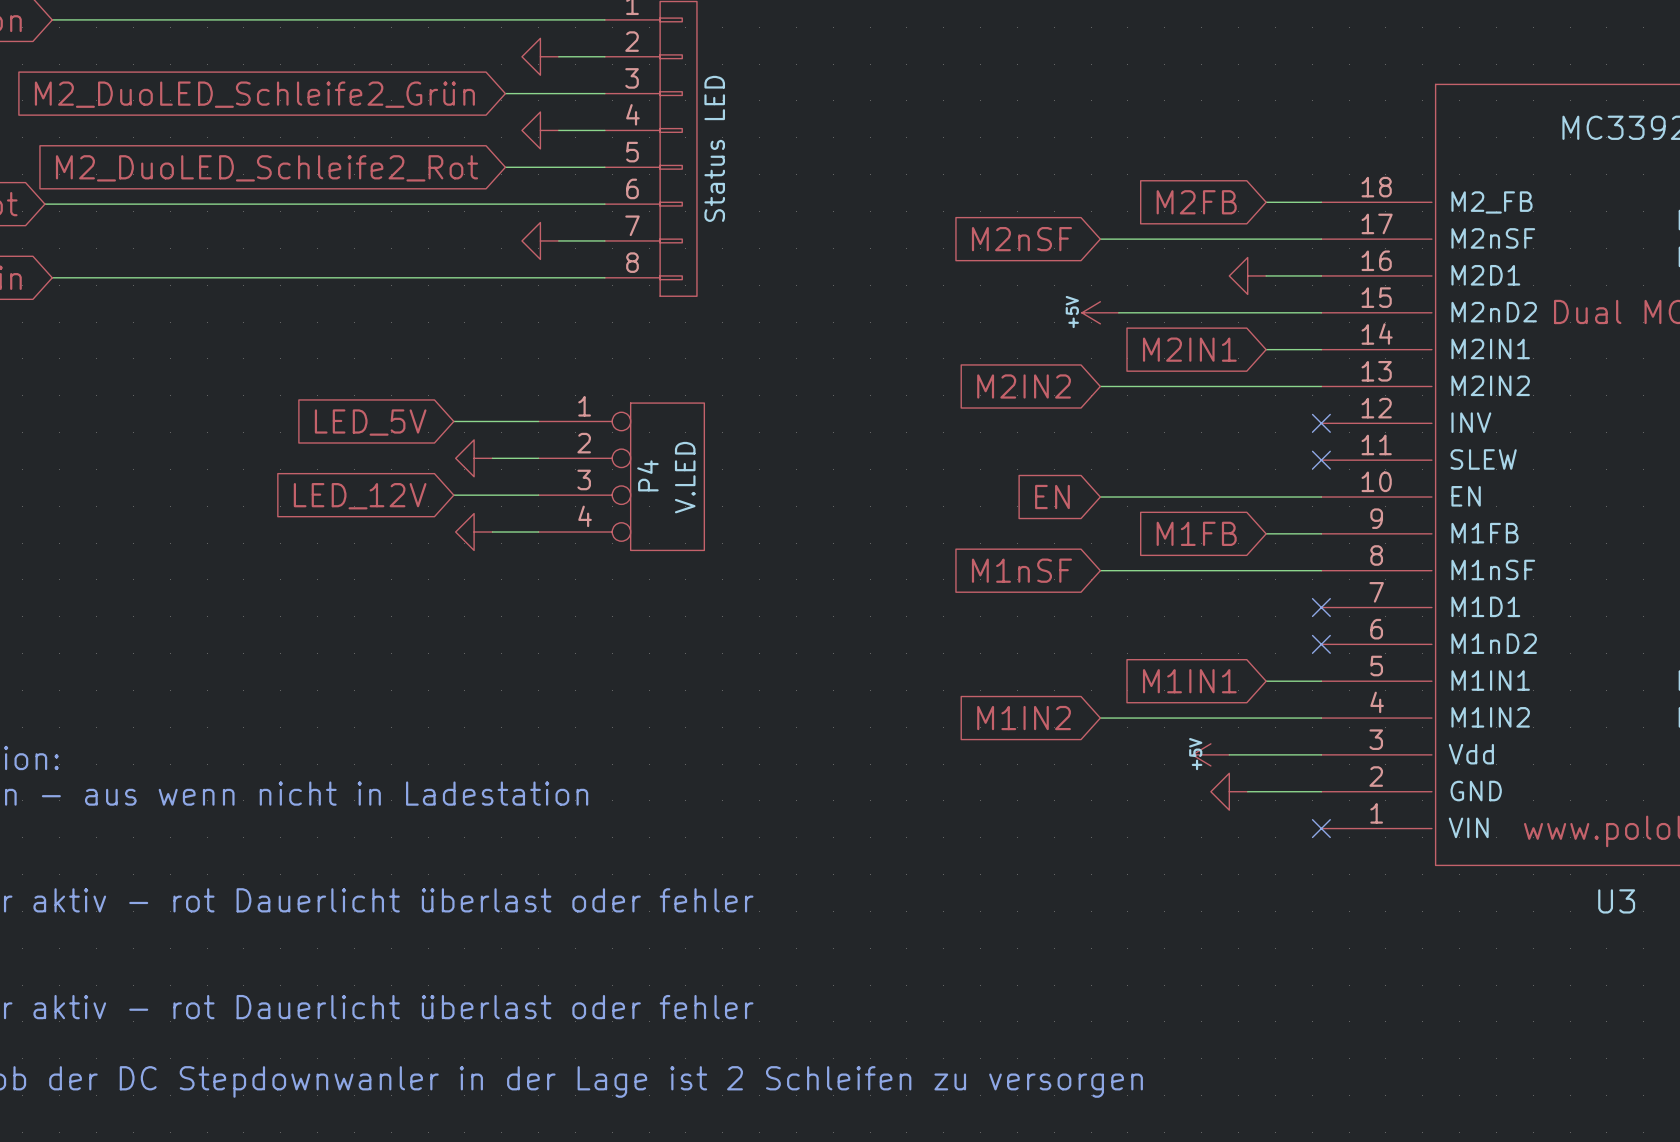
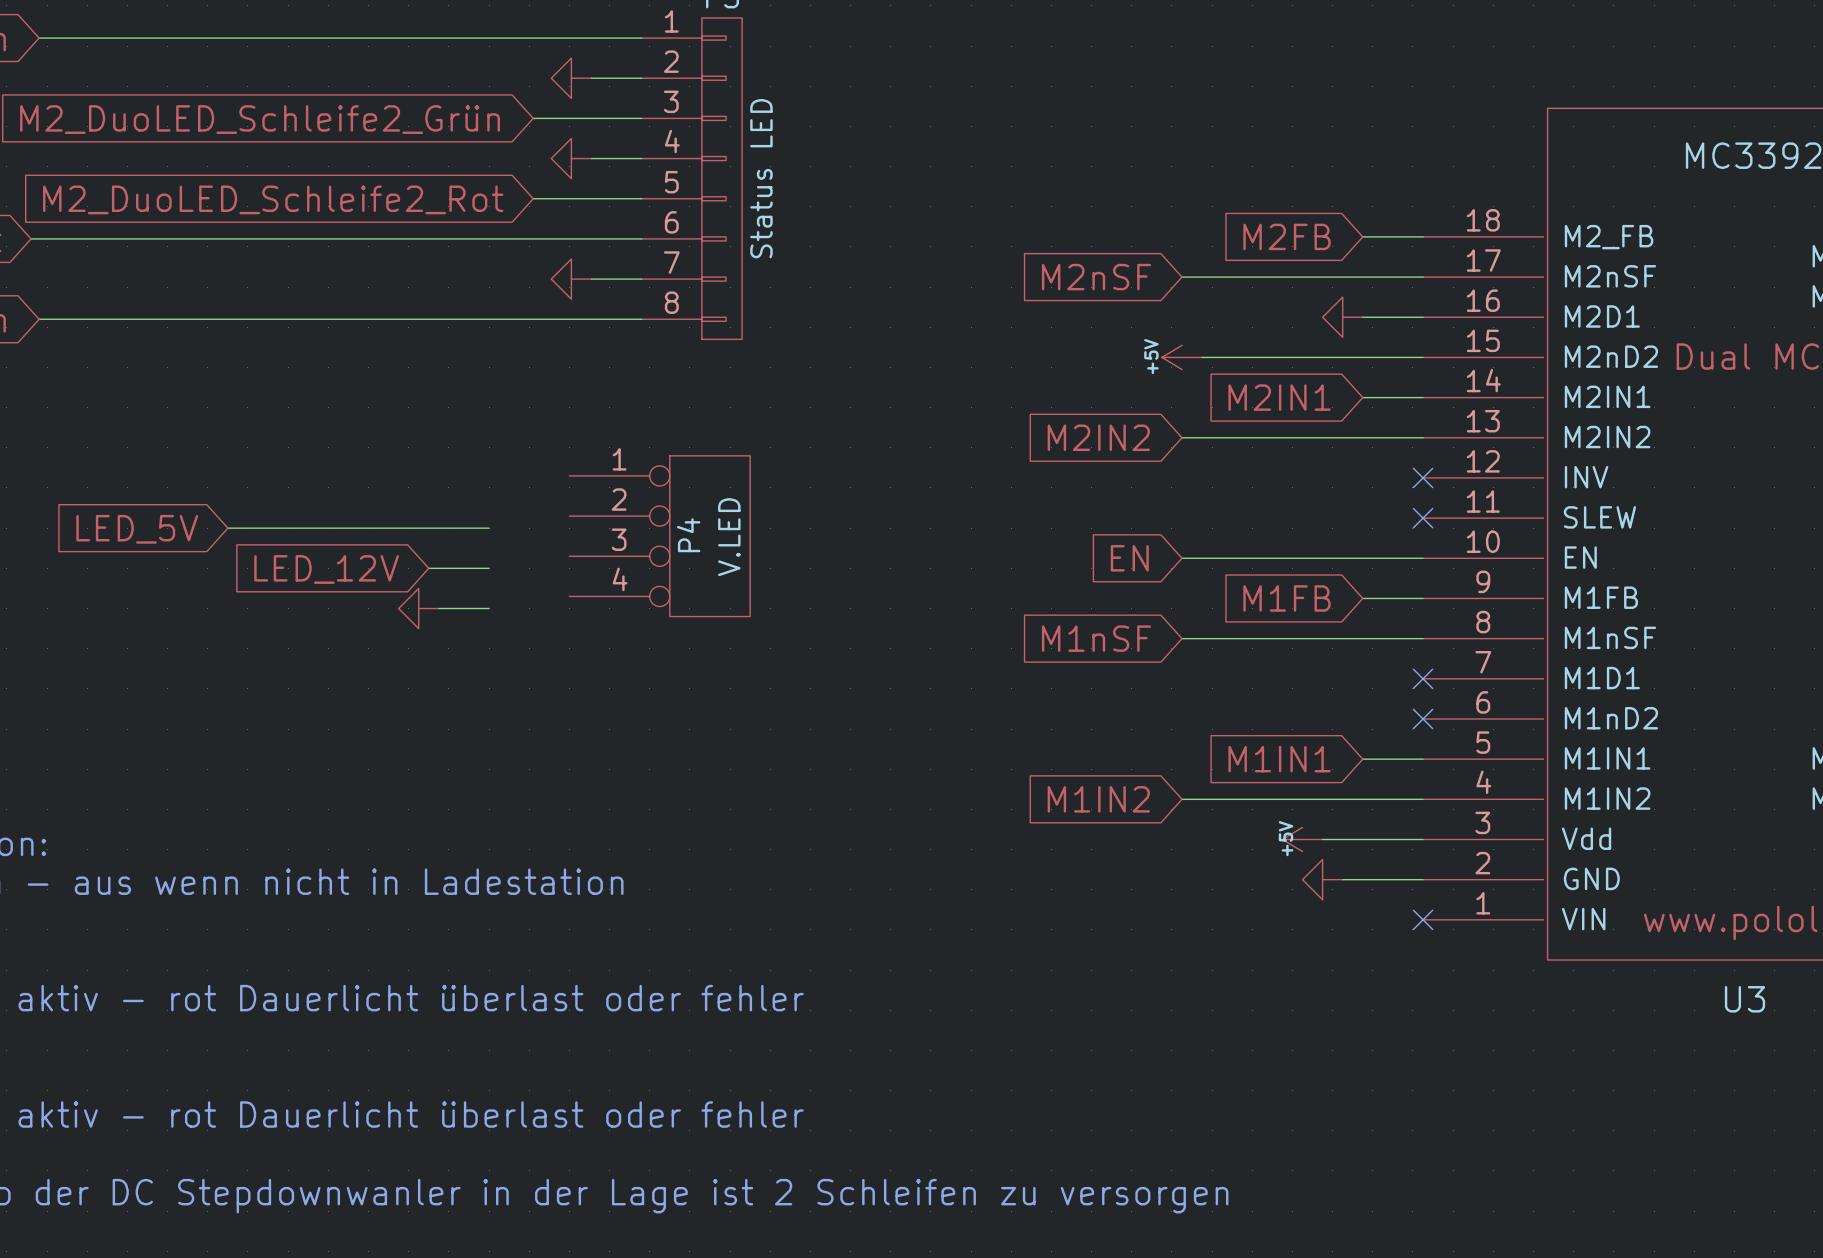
wire: (453, 421) (538, 421) -> none
global label position: LED_5V (370, 422) -> LED_5V (137, 529)
power symbol: (474, 458) -> none
wire: (492, 458) (538, 458) -> none
wire: none -> (227, 528) (489, 528)
wire: (453, 495) (538, 495) -> none
global label position: LED_12V (360, 496) -> LED_12V (326, 569)
wire: none -> (428, 568) (489, 568)
power symbol: (474, 532) -> none
wire: (492, 532) (538, 532) -> (438, 608) (489, 608)
power symbol: none -> (418, 608)

